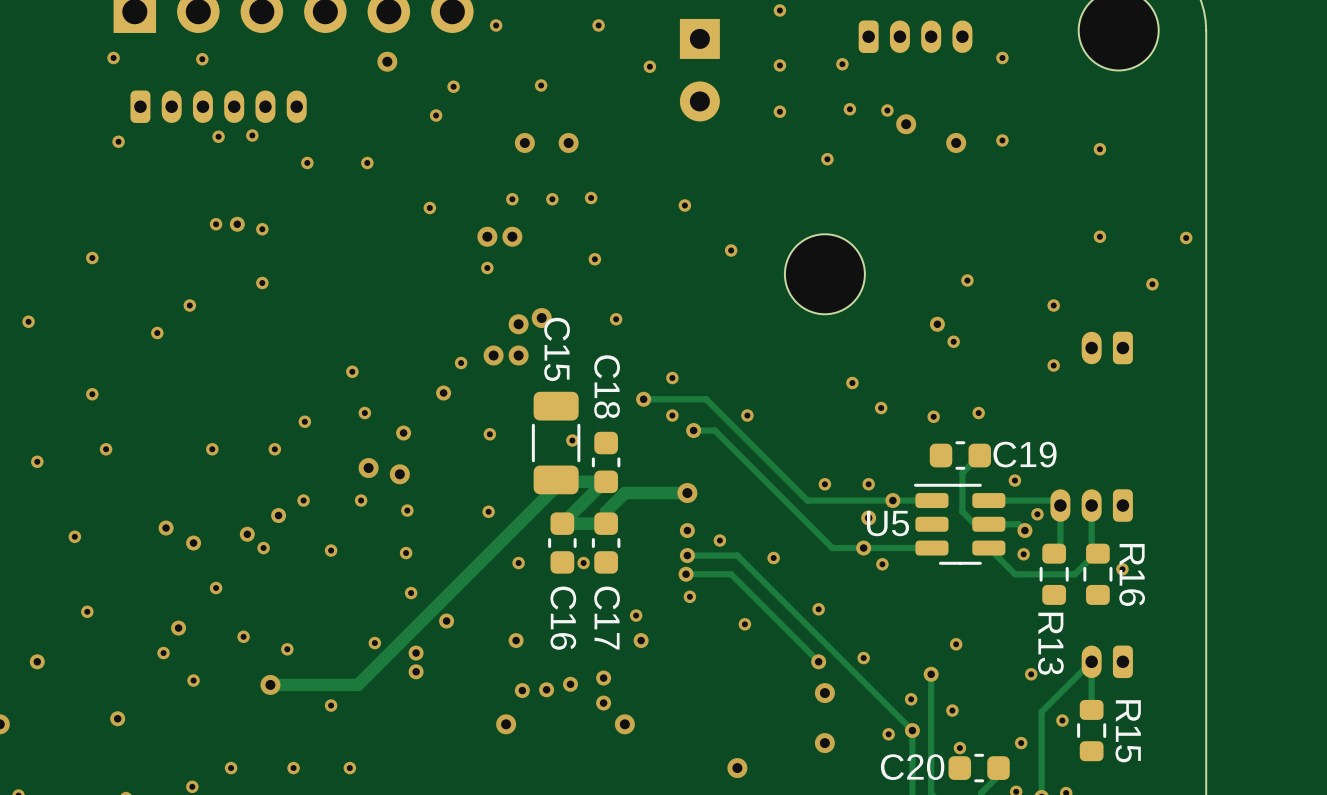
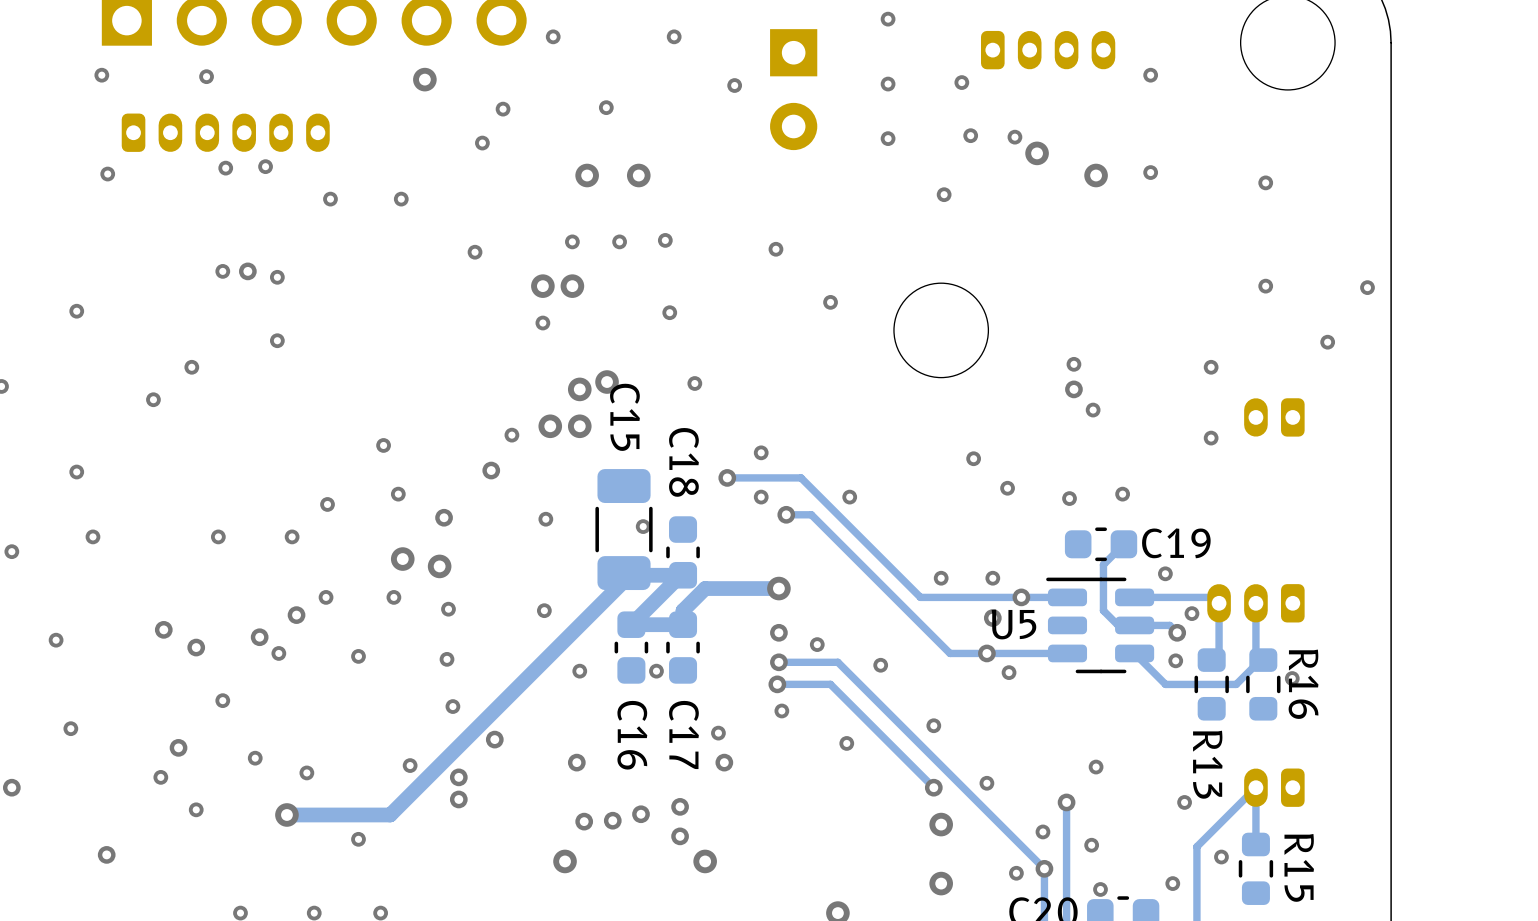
via position: (967, 280) -> (1073, 364)

